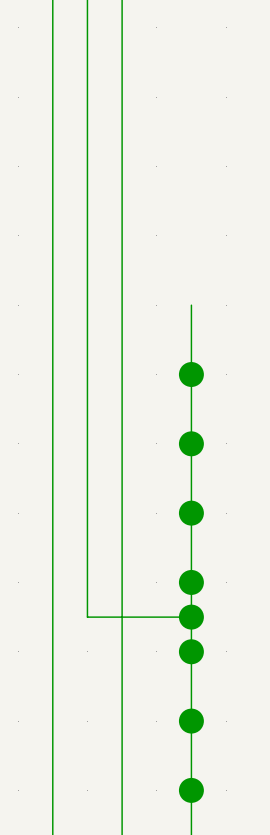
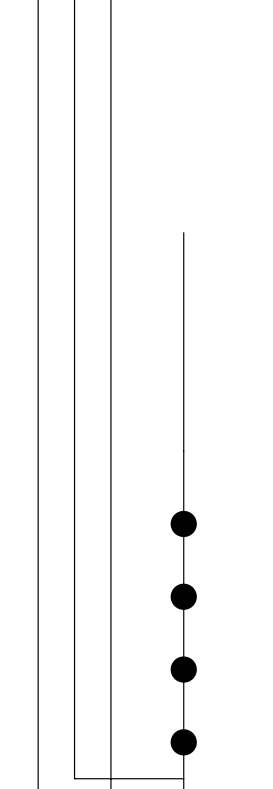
junction: (191, 374) -> none
junction: (191, 443) -> none
junction: (191, 513) -> none
wire: (87, 617) (191, 617) -> (74, 560) (74, 778) (183, 778)
junction: (191, 617) -> none

